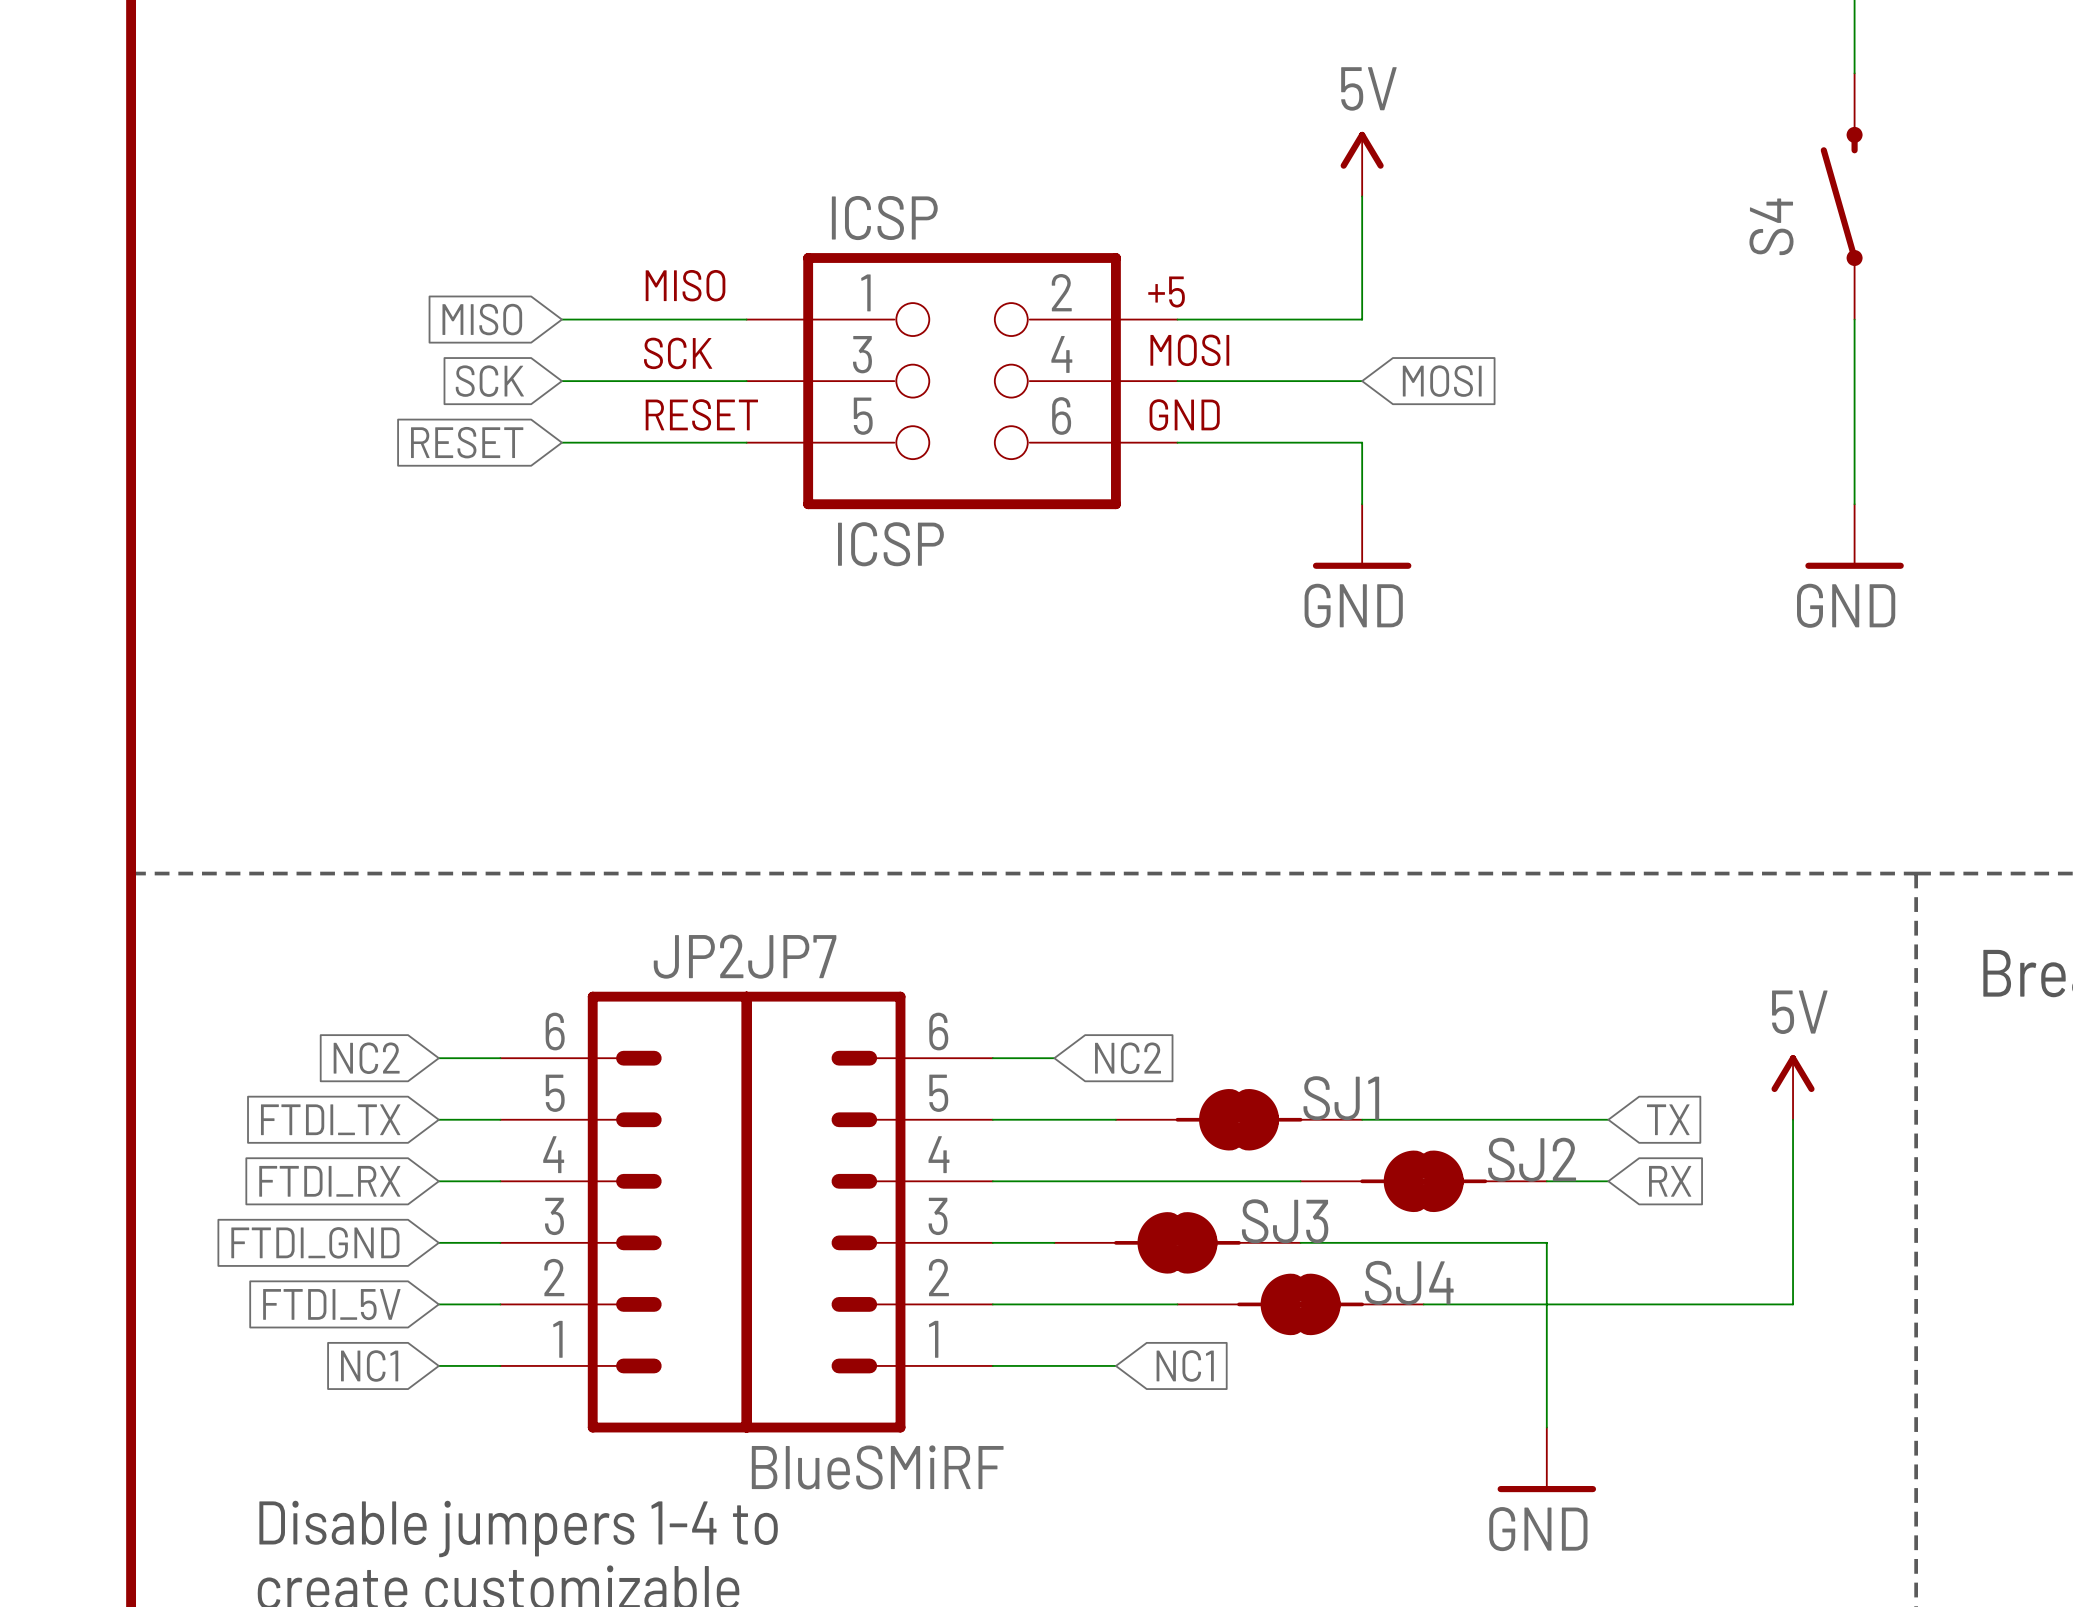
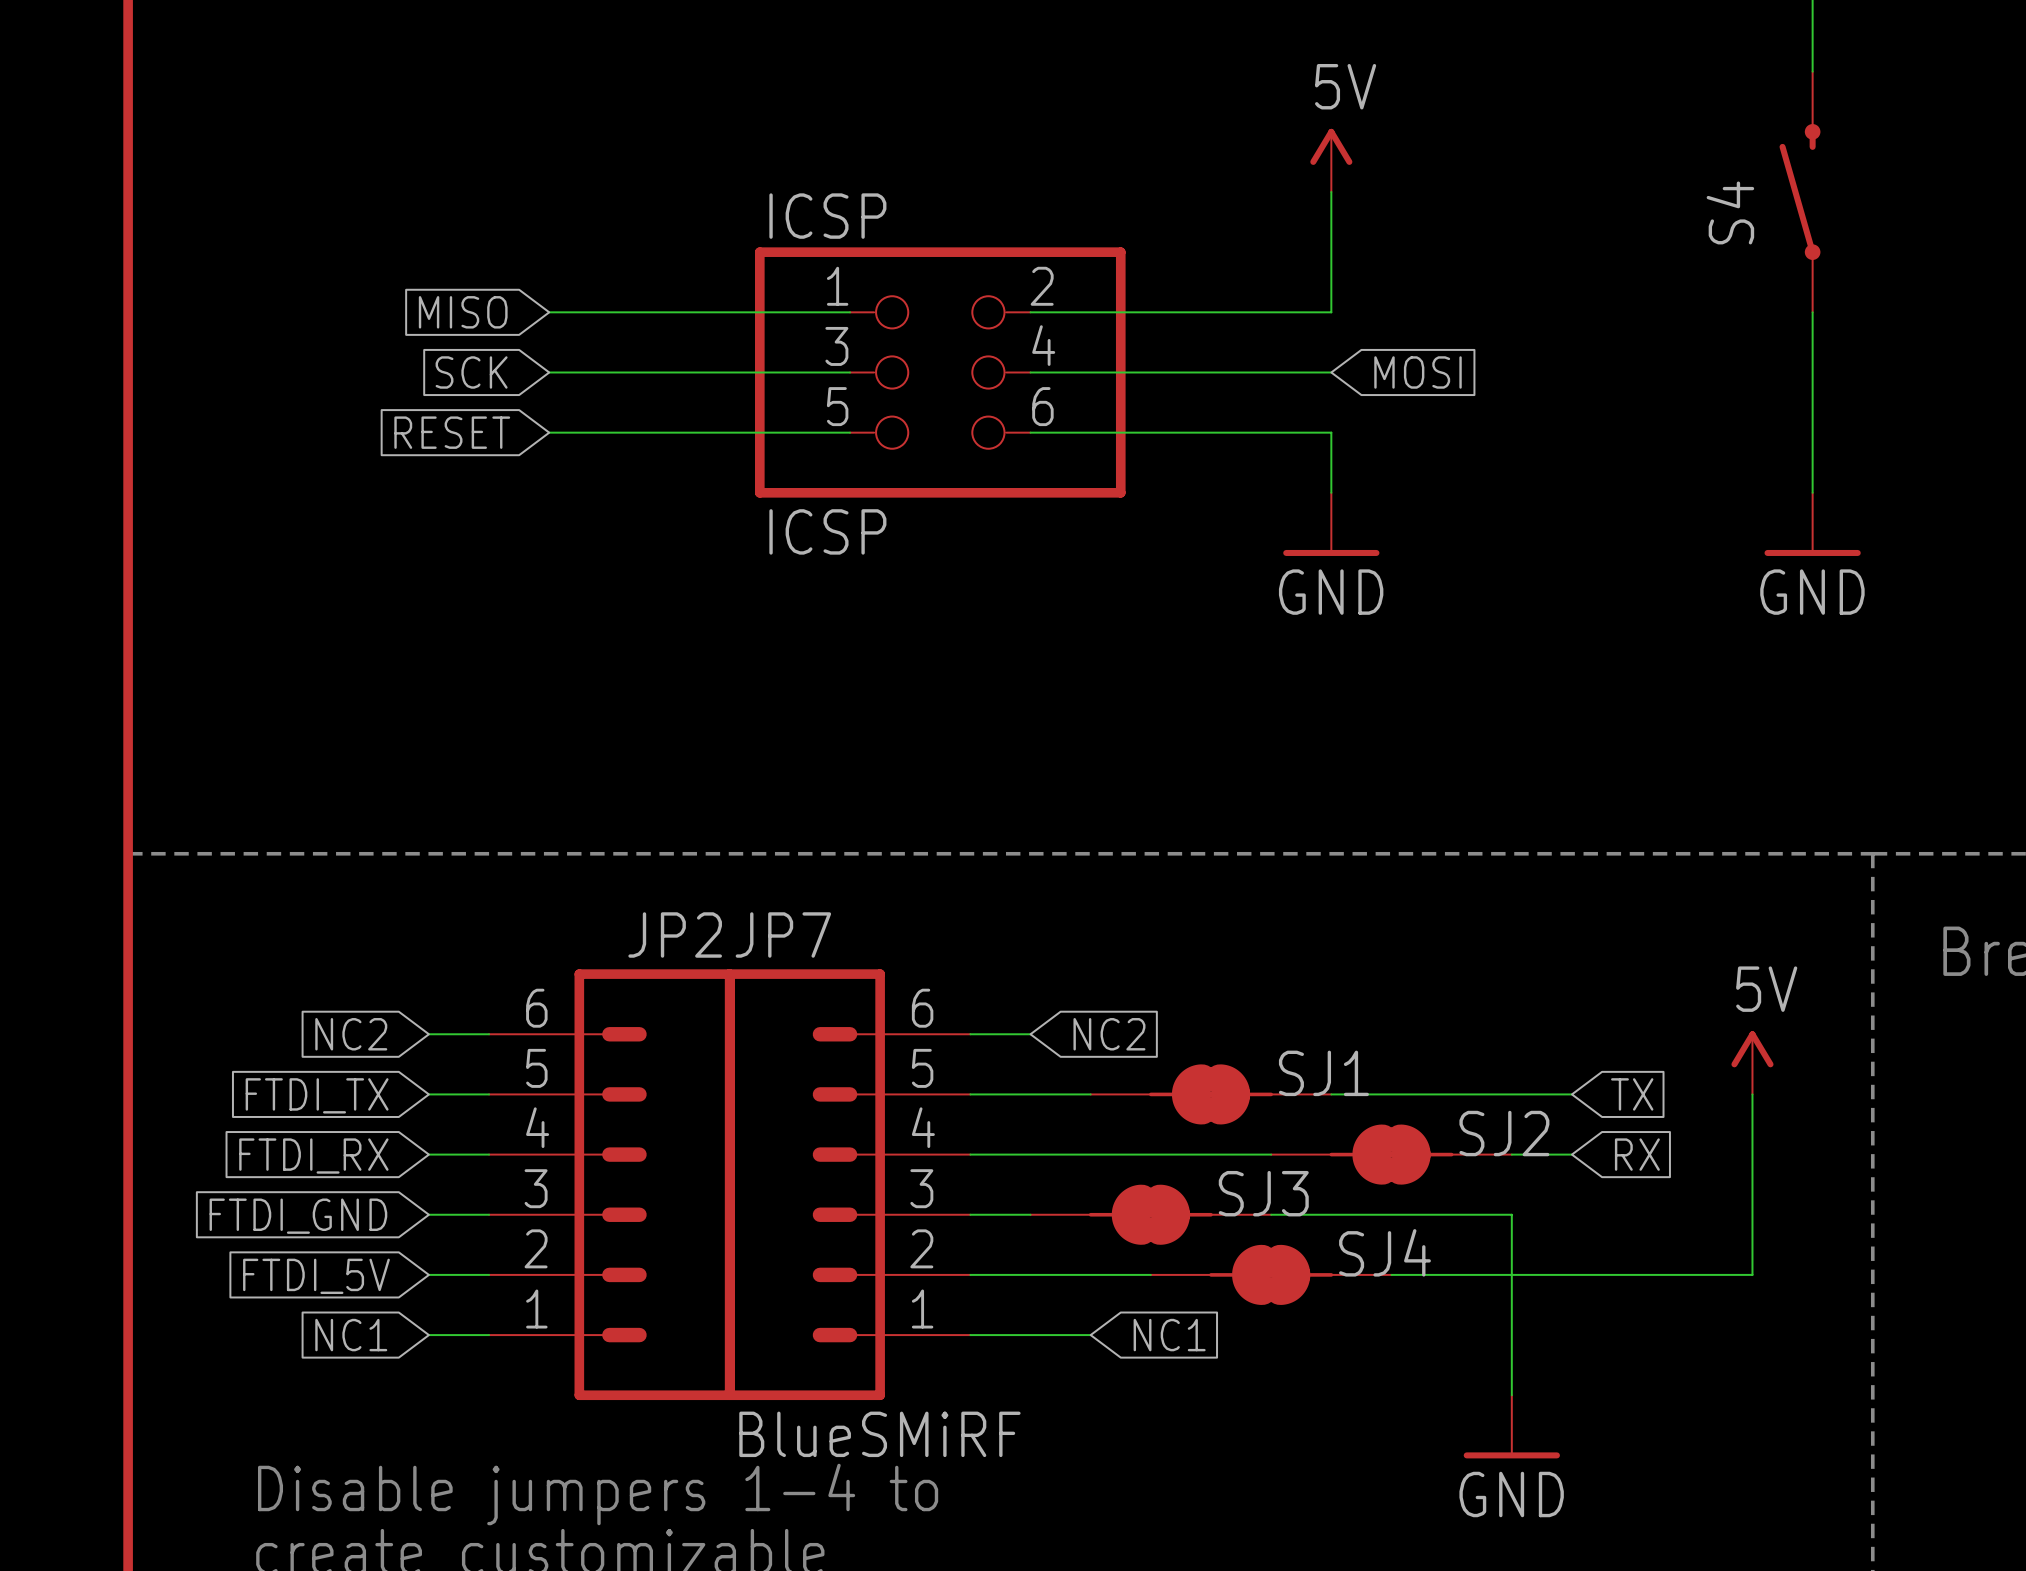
ICSP name position: ICSP (884, 218) -> ICSP (827, 216)
ICSP symbol: [746, 253, 1178, 510] -> [754, 247, 1126, 498]
ICSP value position: ICSP (890, 544) -> ICSP (827, 531)

